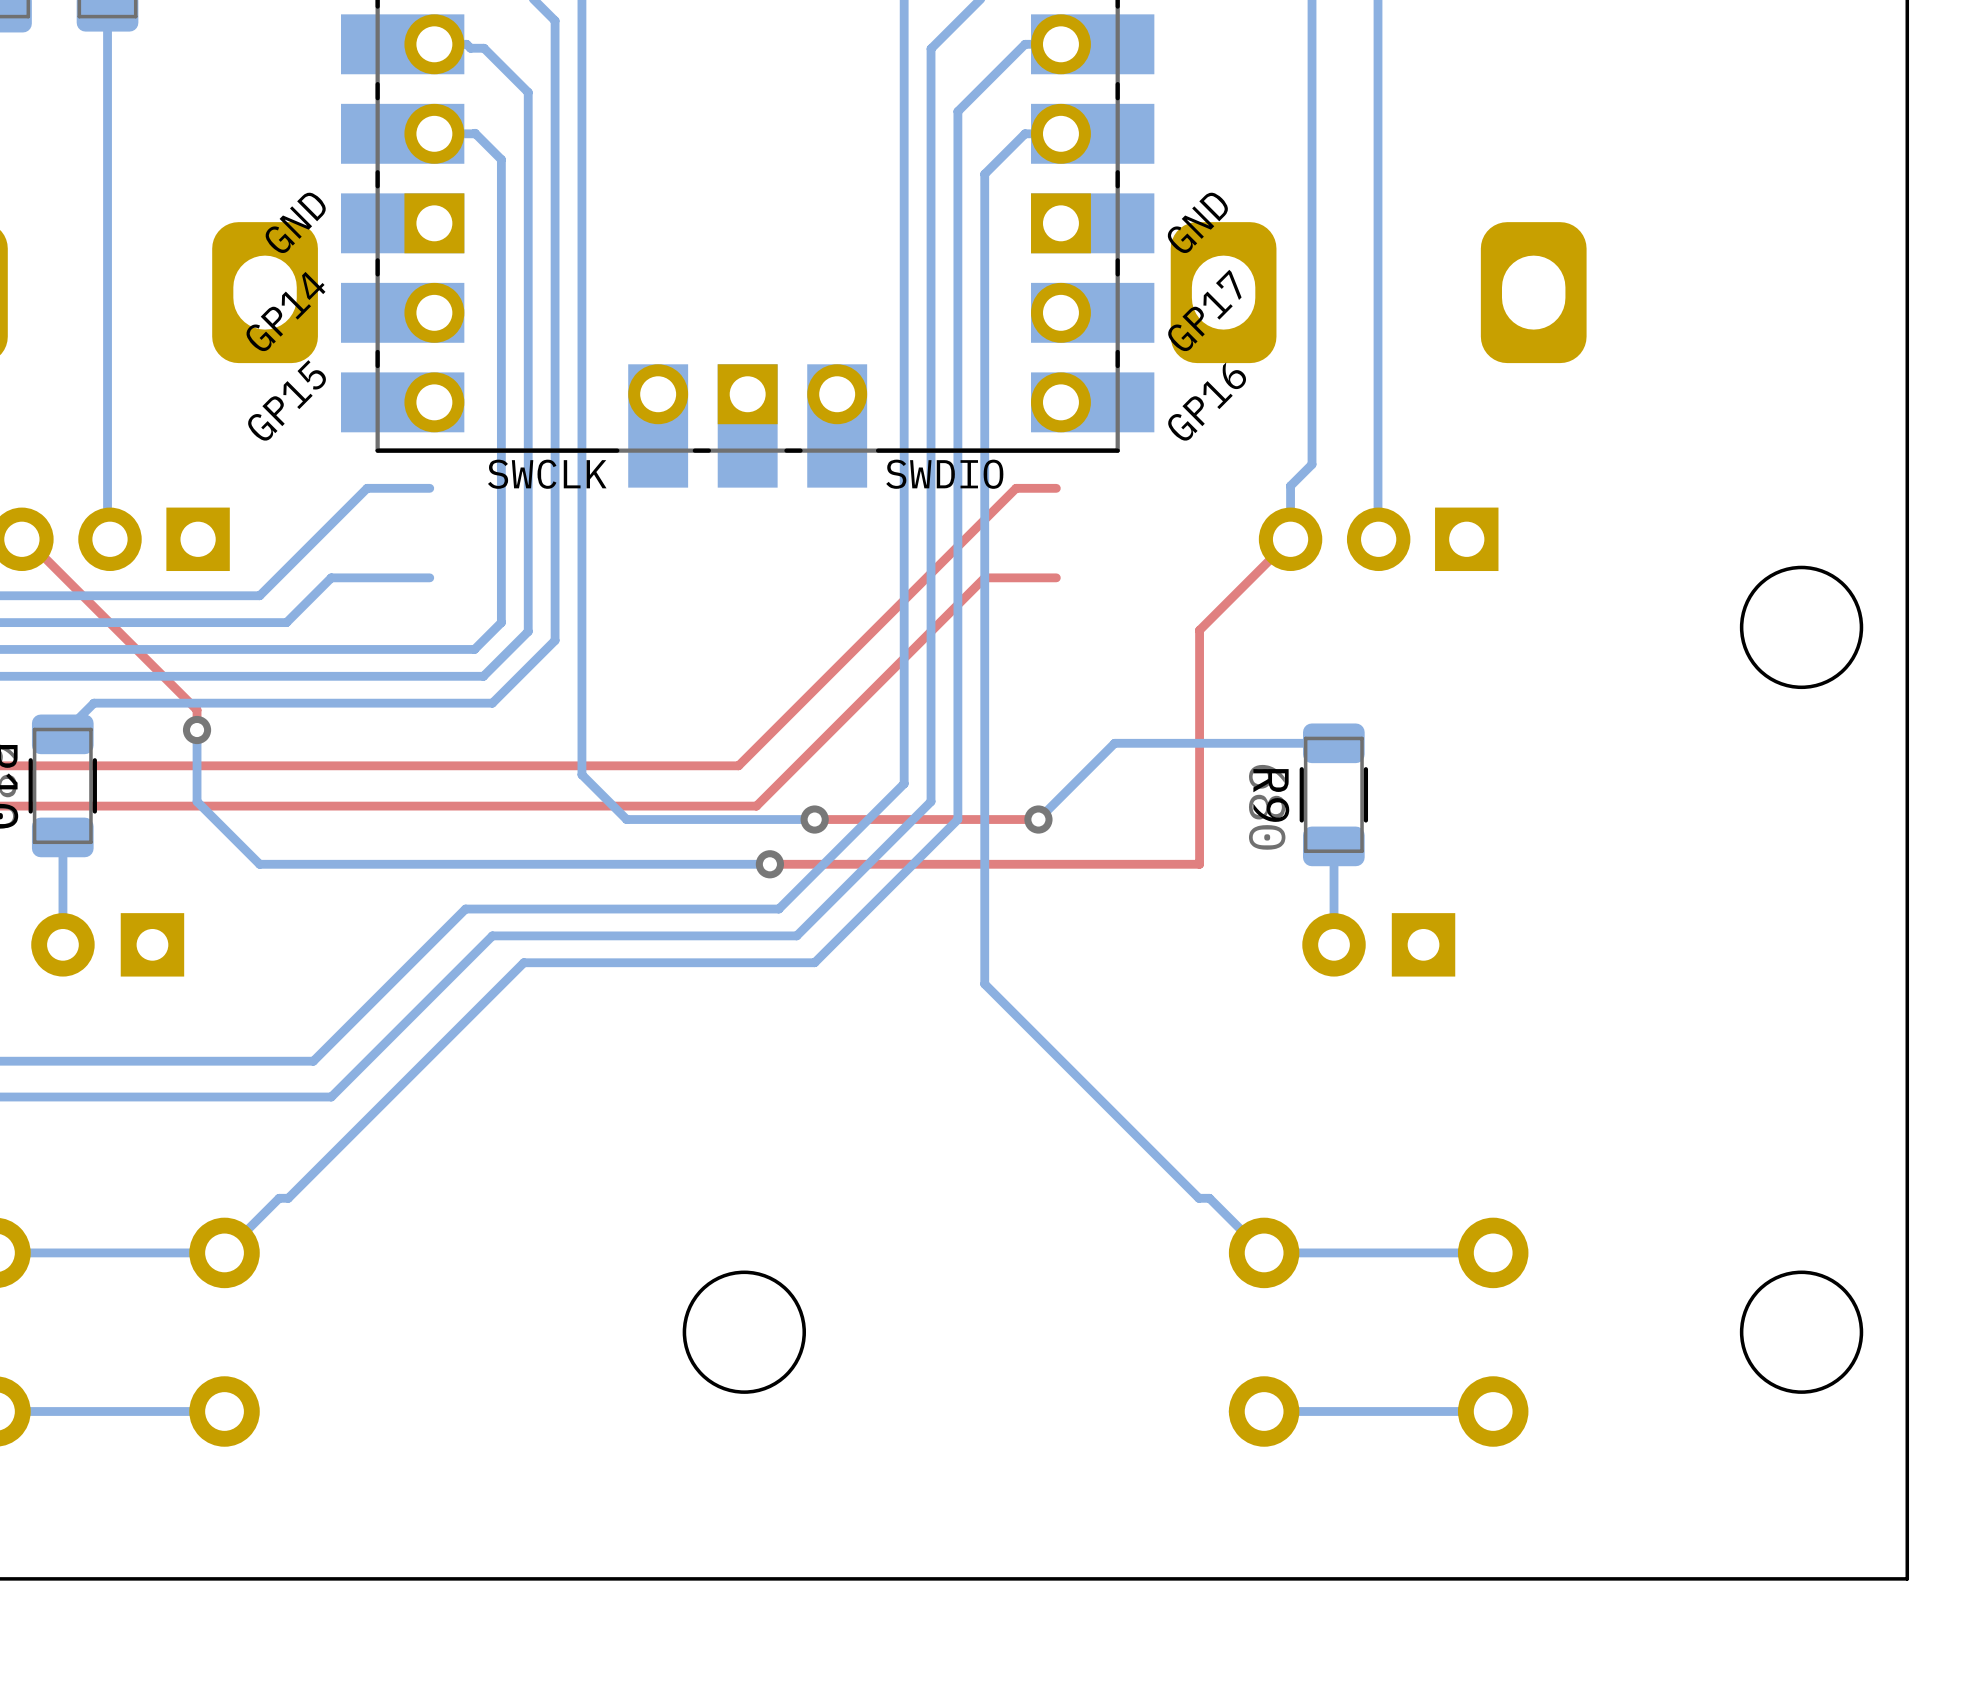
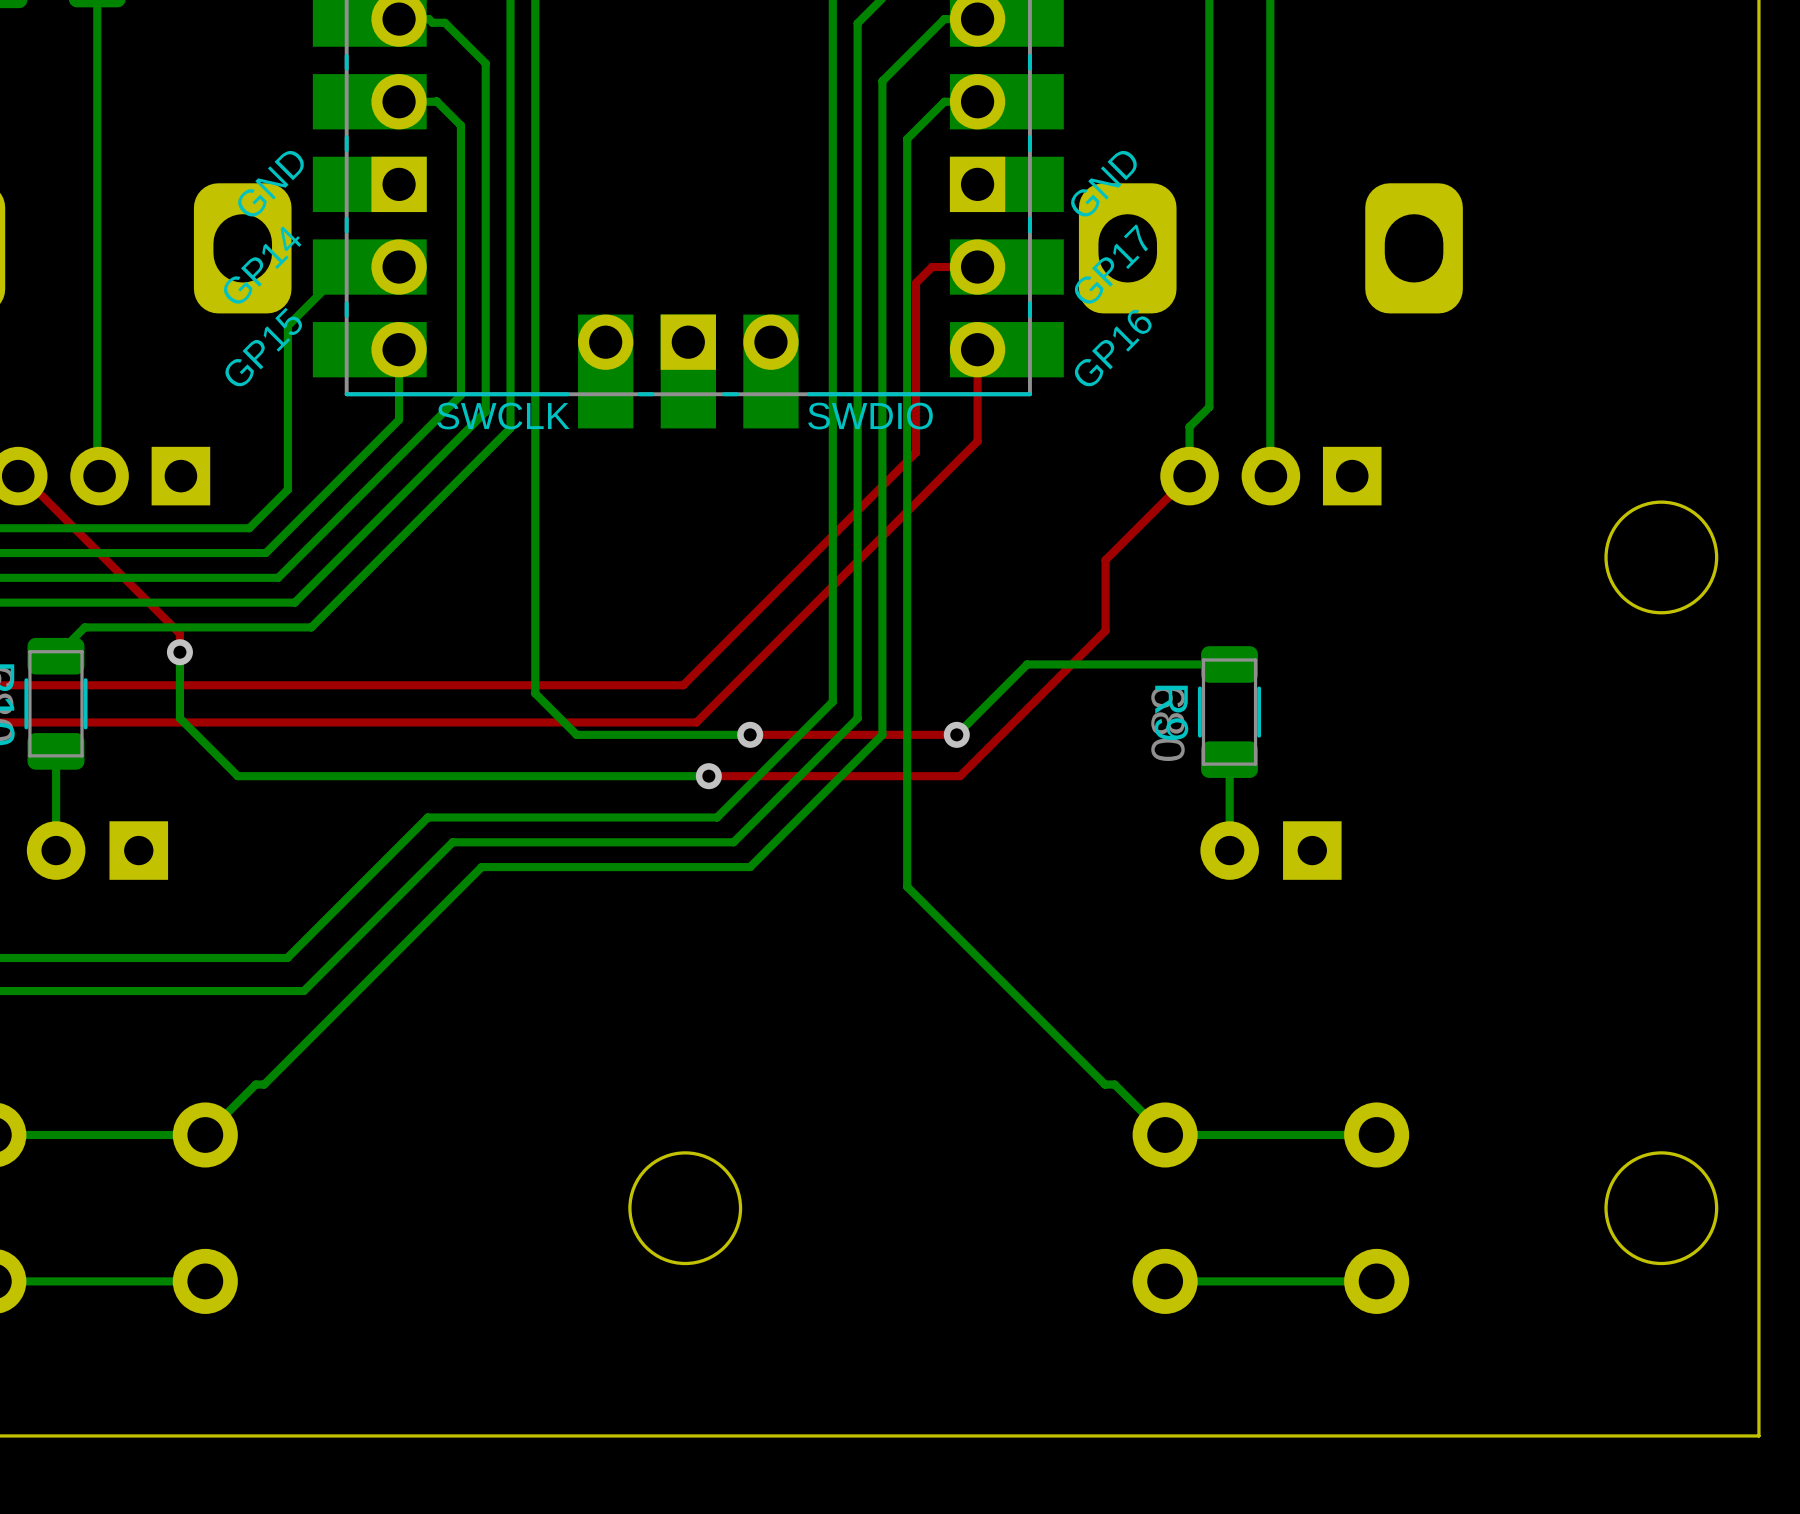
bottom track: (501, 451) (501, 622) (474, 649) (303, 649) -> (460, 395) (278, 577)
bottom track: (528, 469) (528, 631) (483, 676) (321, 676) -> (485, 411) (294, 602)
bottom track: (555, 487) (555, 640) (492, 703) (339, 703) -> (510, 428) (311, 627)
bottom track: (429, 488) (367, 488) (259, 595) -> (399, 267) (346, 267) (287, 325) (287, 489) (249, 528) (237, 528)
top track: (1056, 488) (1016, 488) (738, 765) -> (977, 267) (932, 267) (915, 283) (915, 452) (683, 685) (679, 685)
bottom track: (429, 577) (331, 577) (286, 622) -> (399, 349) (399, 419) (265, 553) (262, 553)
top track: (1056, 577) (984, 577) -> (977, 349) (977, 441) (907, 511)
top track: (1199, 706) (1199, 864) (1042, 864) -> (1105, 630) (960, 776)

